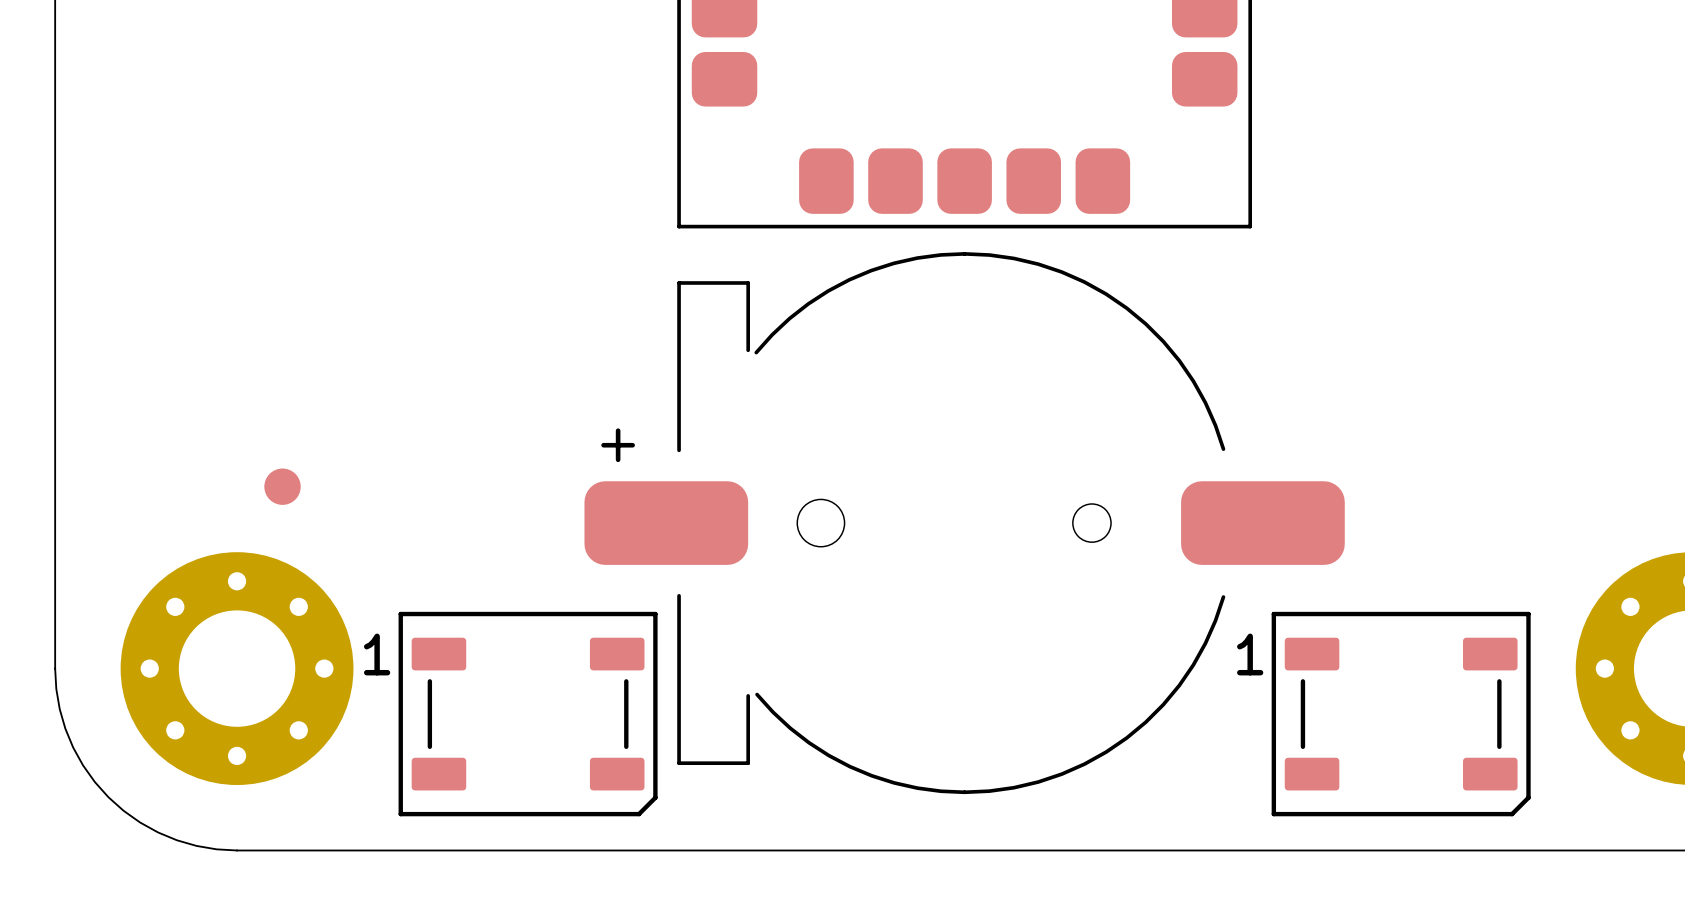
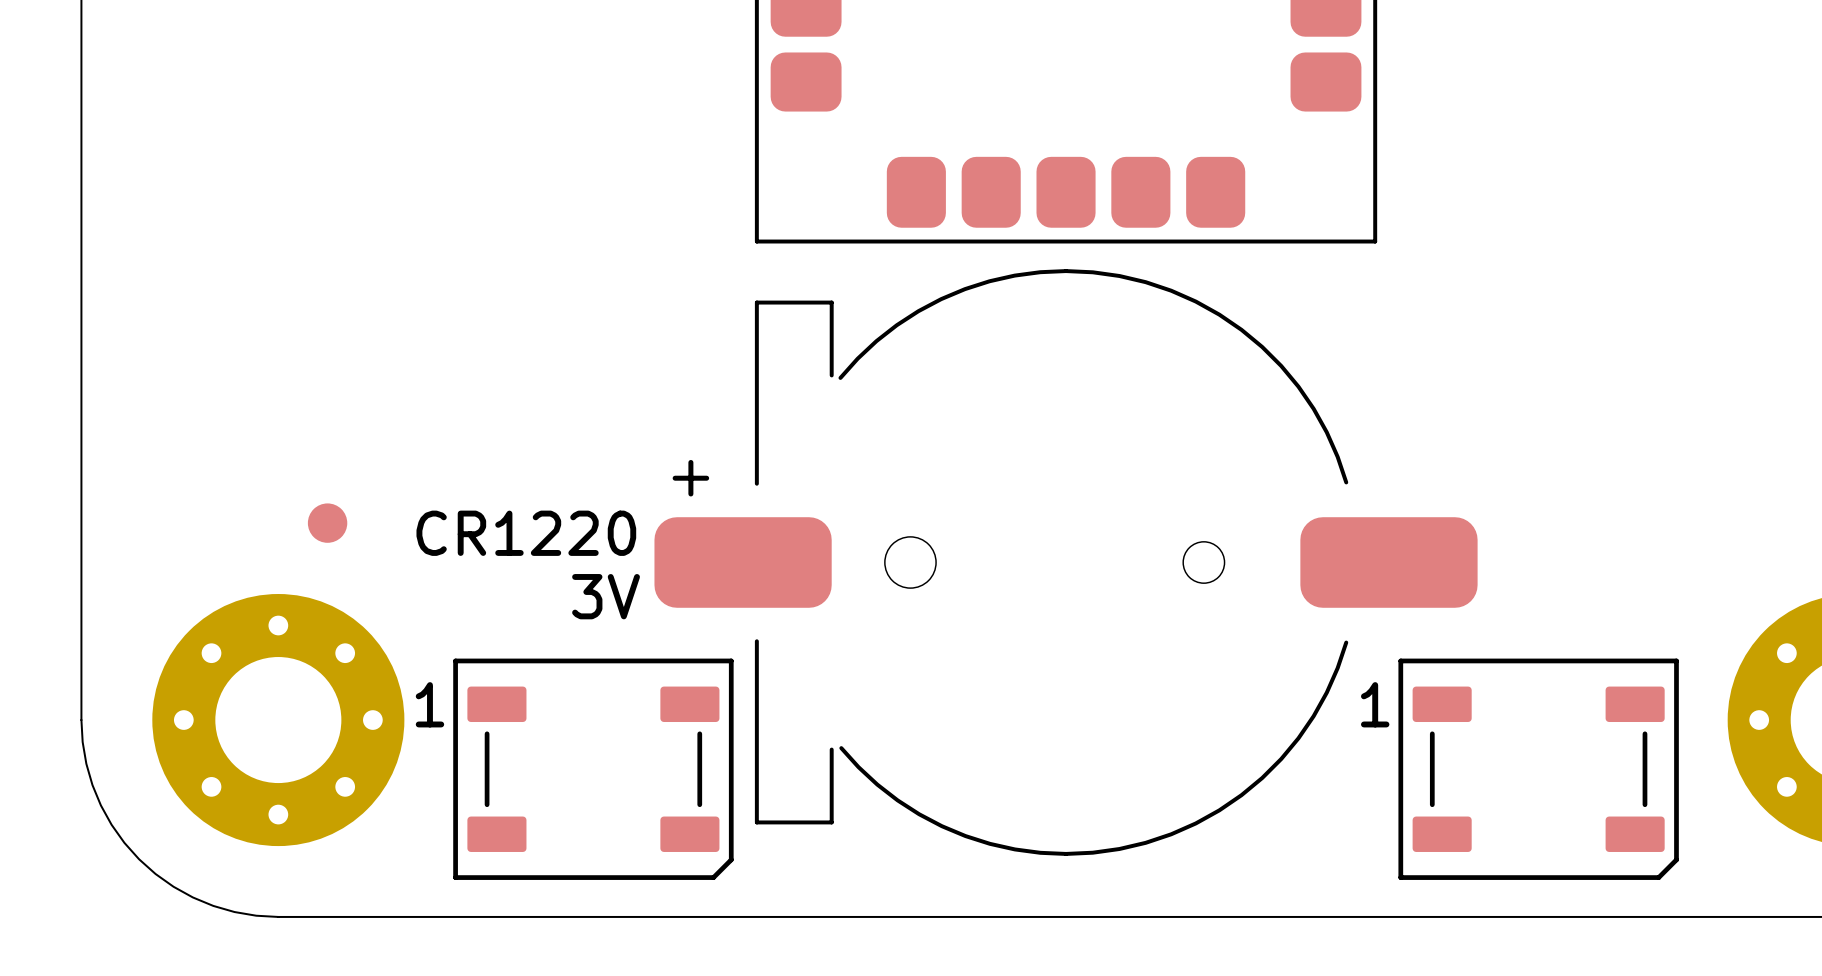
text: none -> CR1220 (526, 533)
text: none -> 3V (606, 596)

